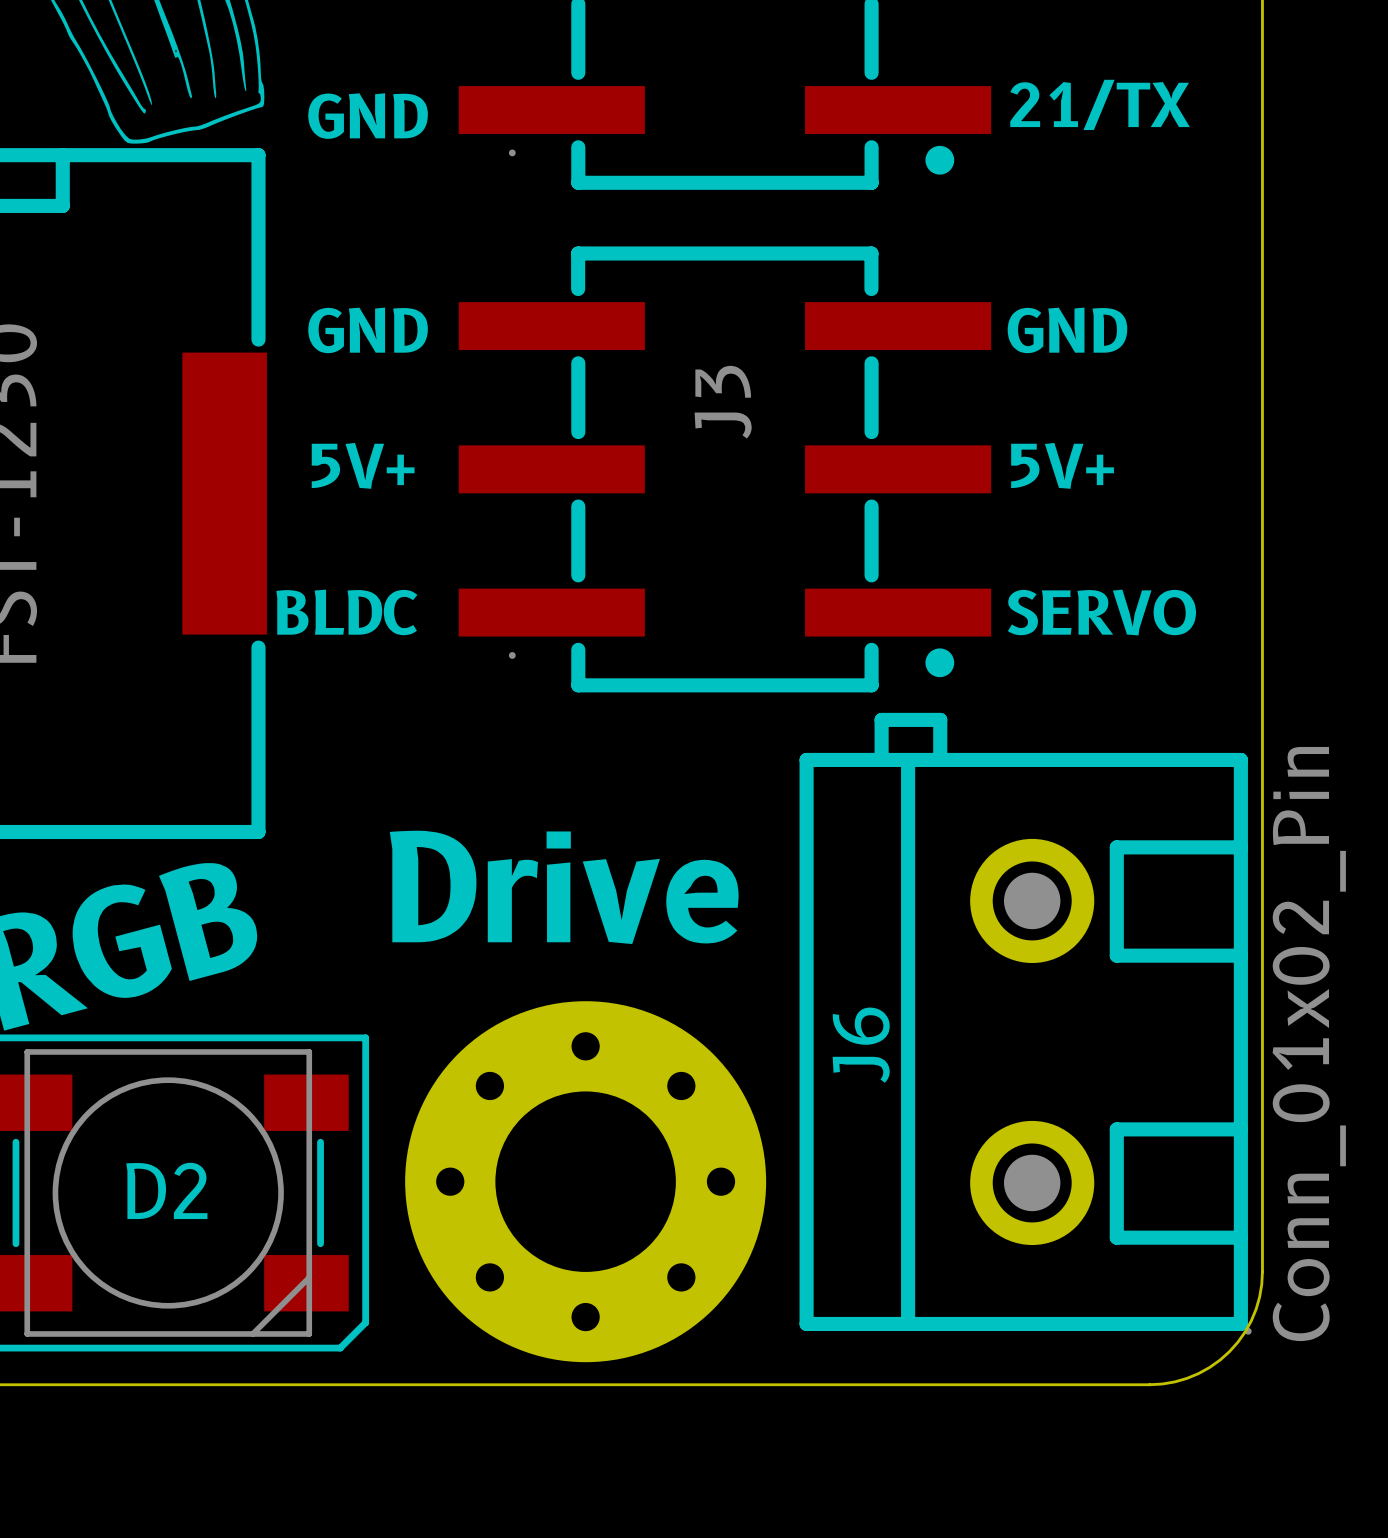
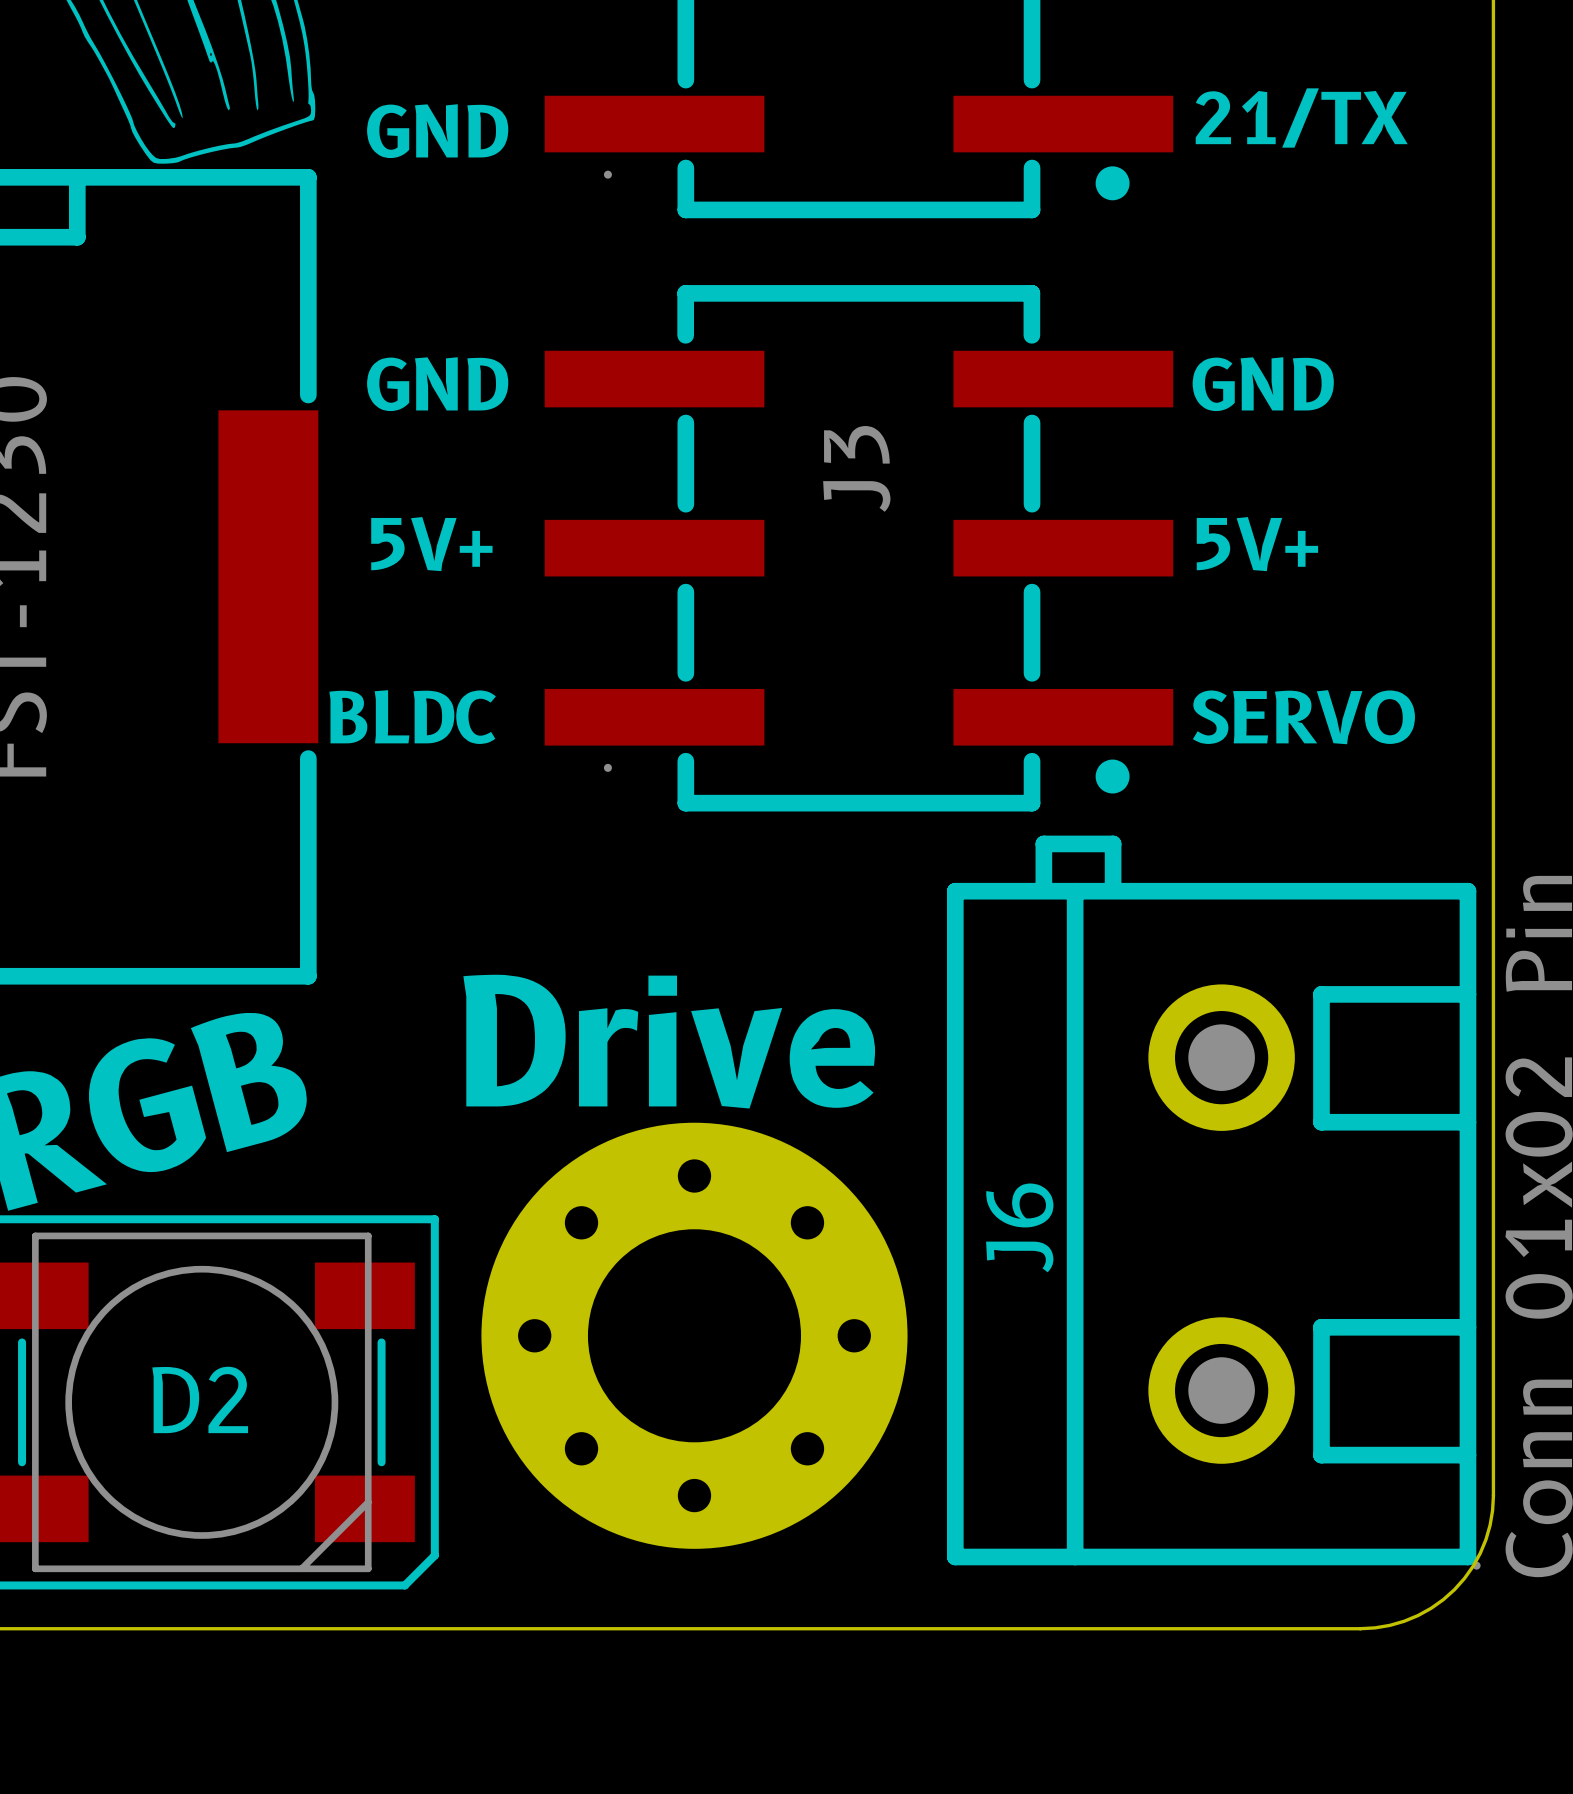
part position: (585, 1181) -> (694, 1335)

